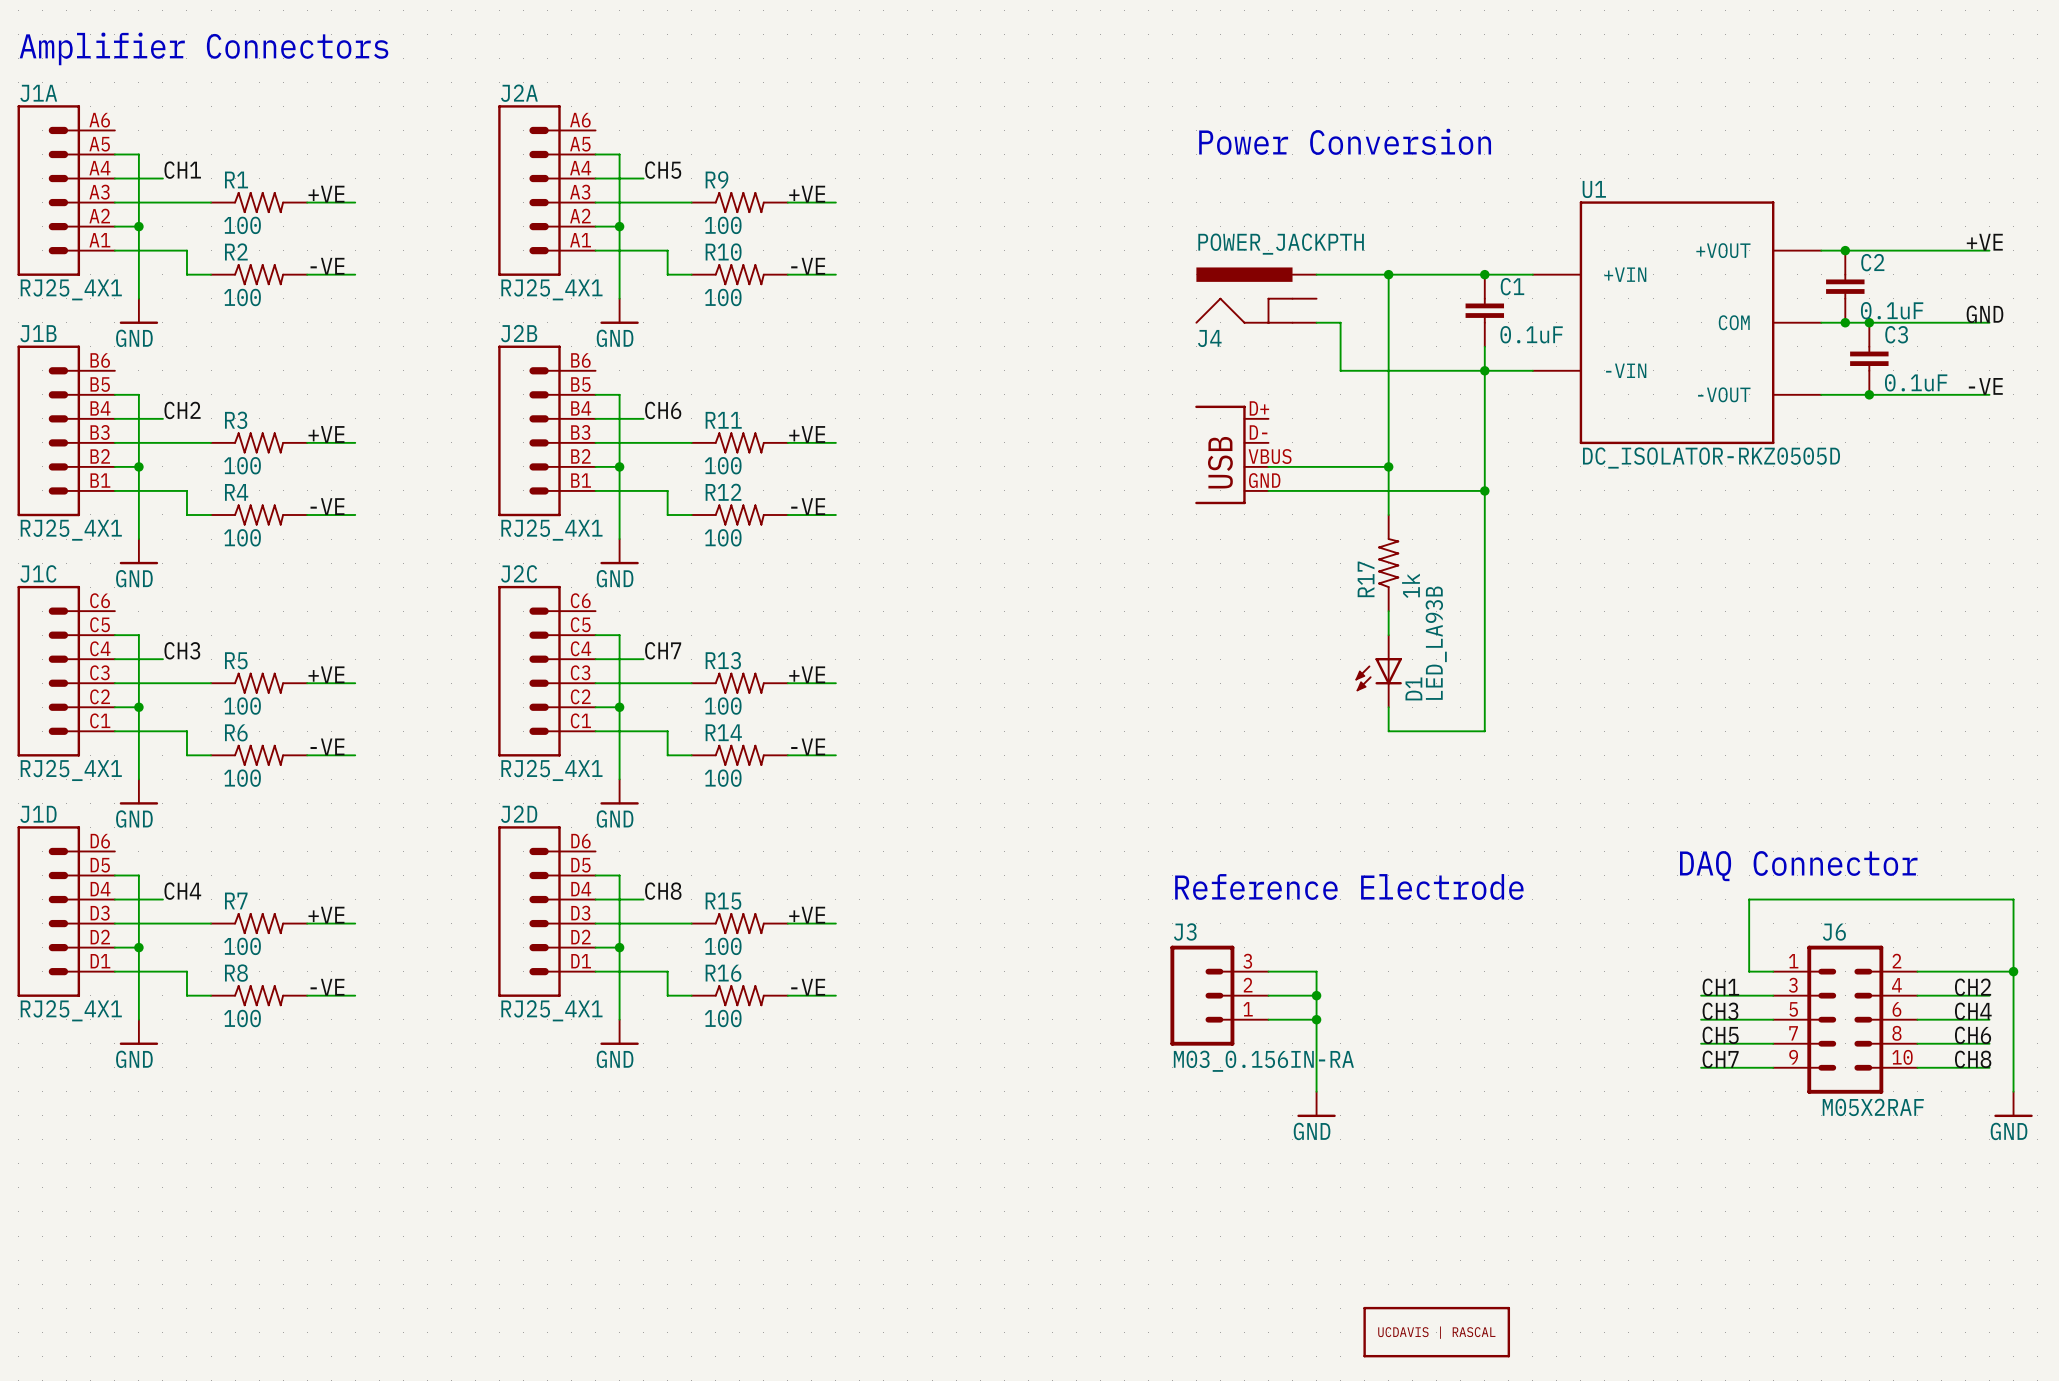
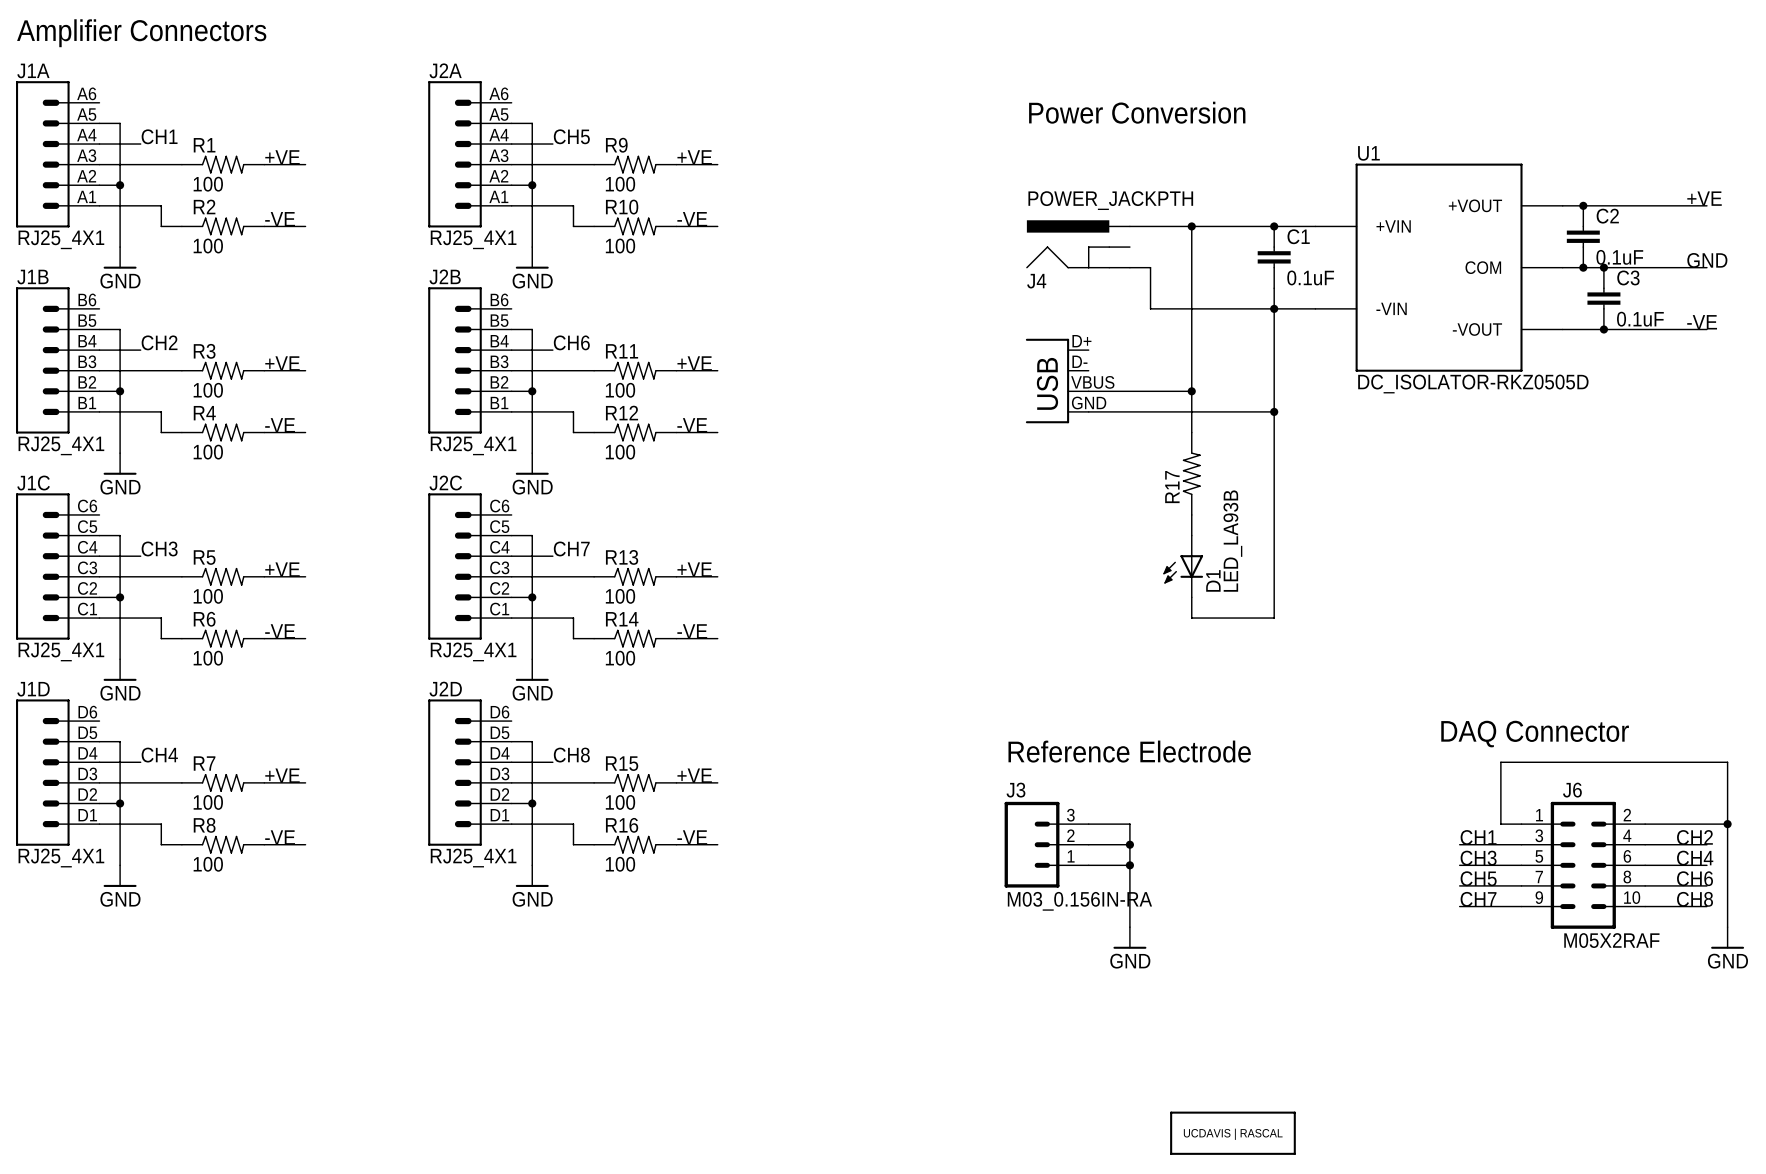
R17 value: 1k (1410, 585) -> none

